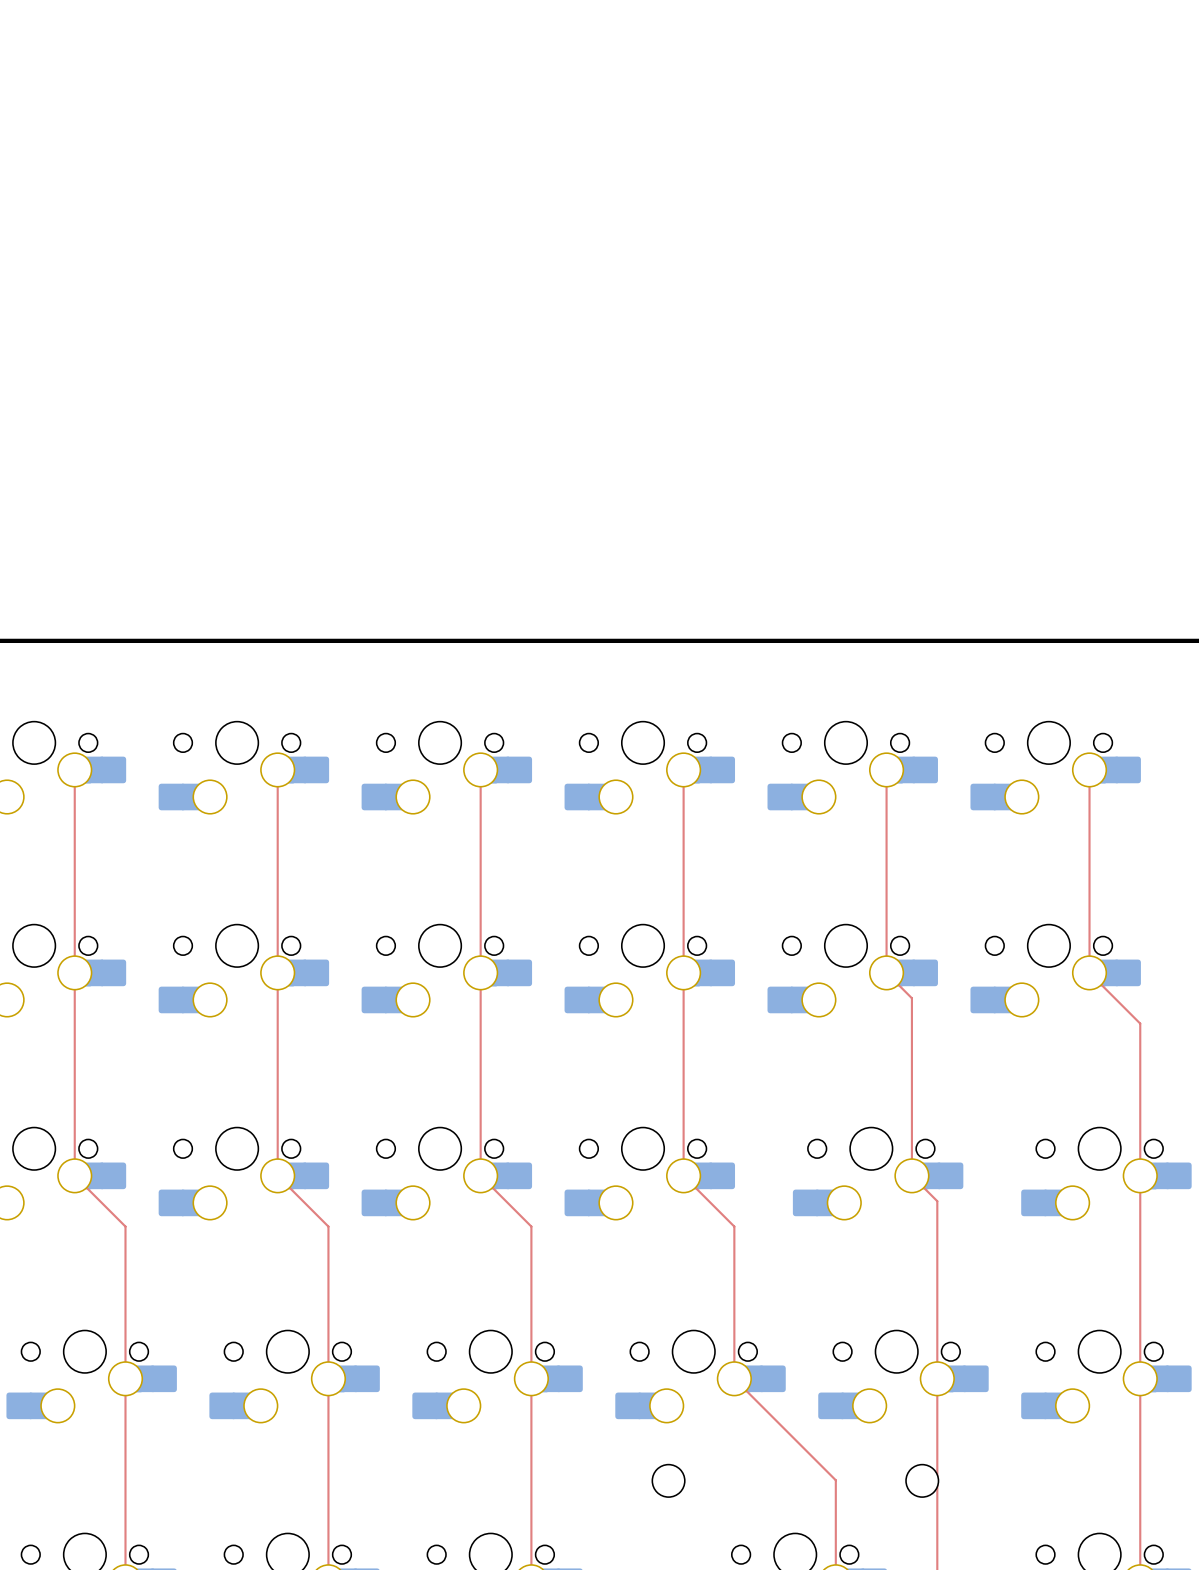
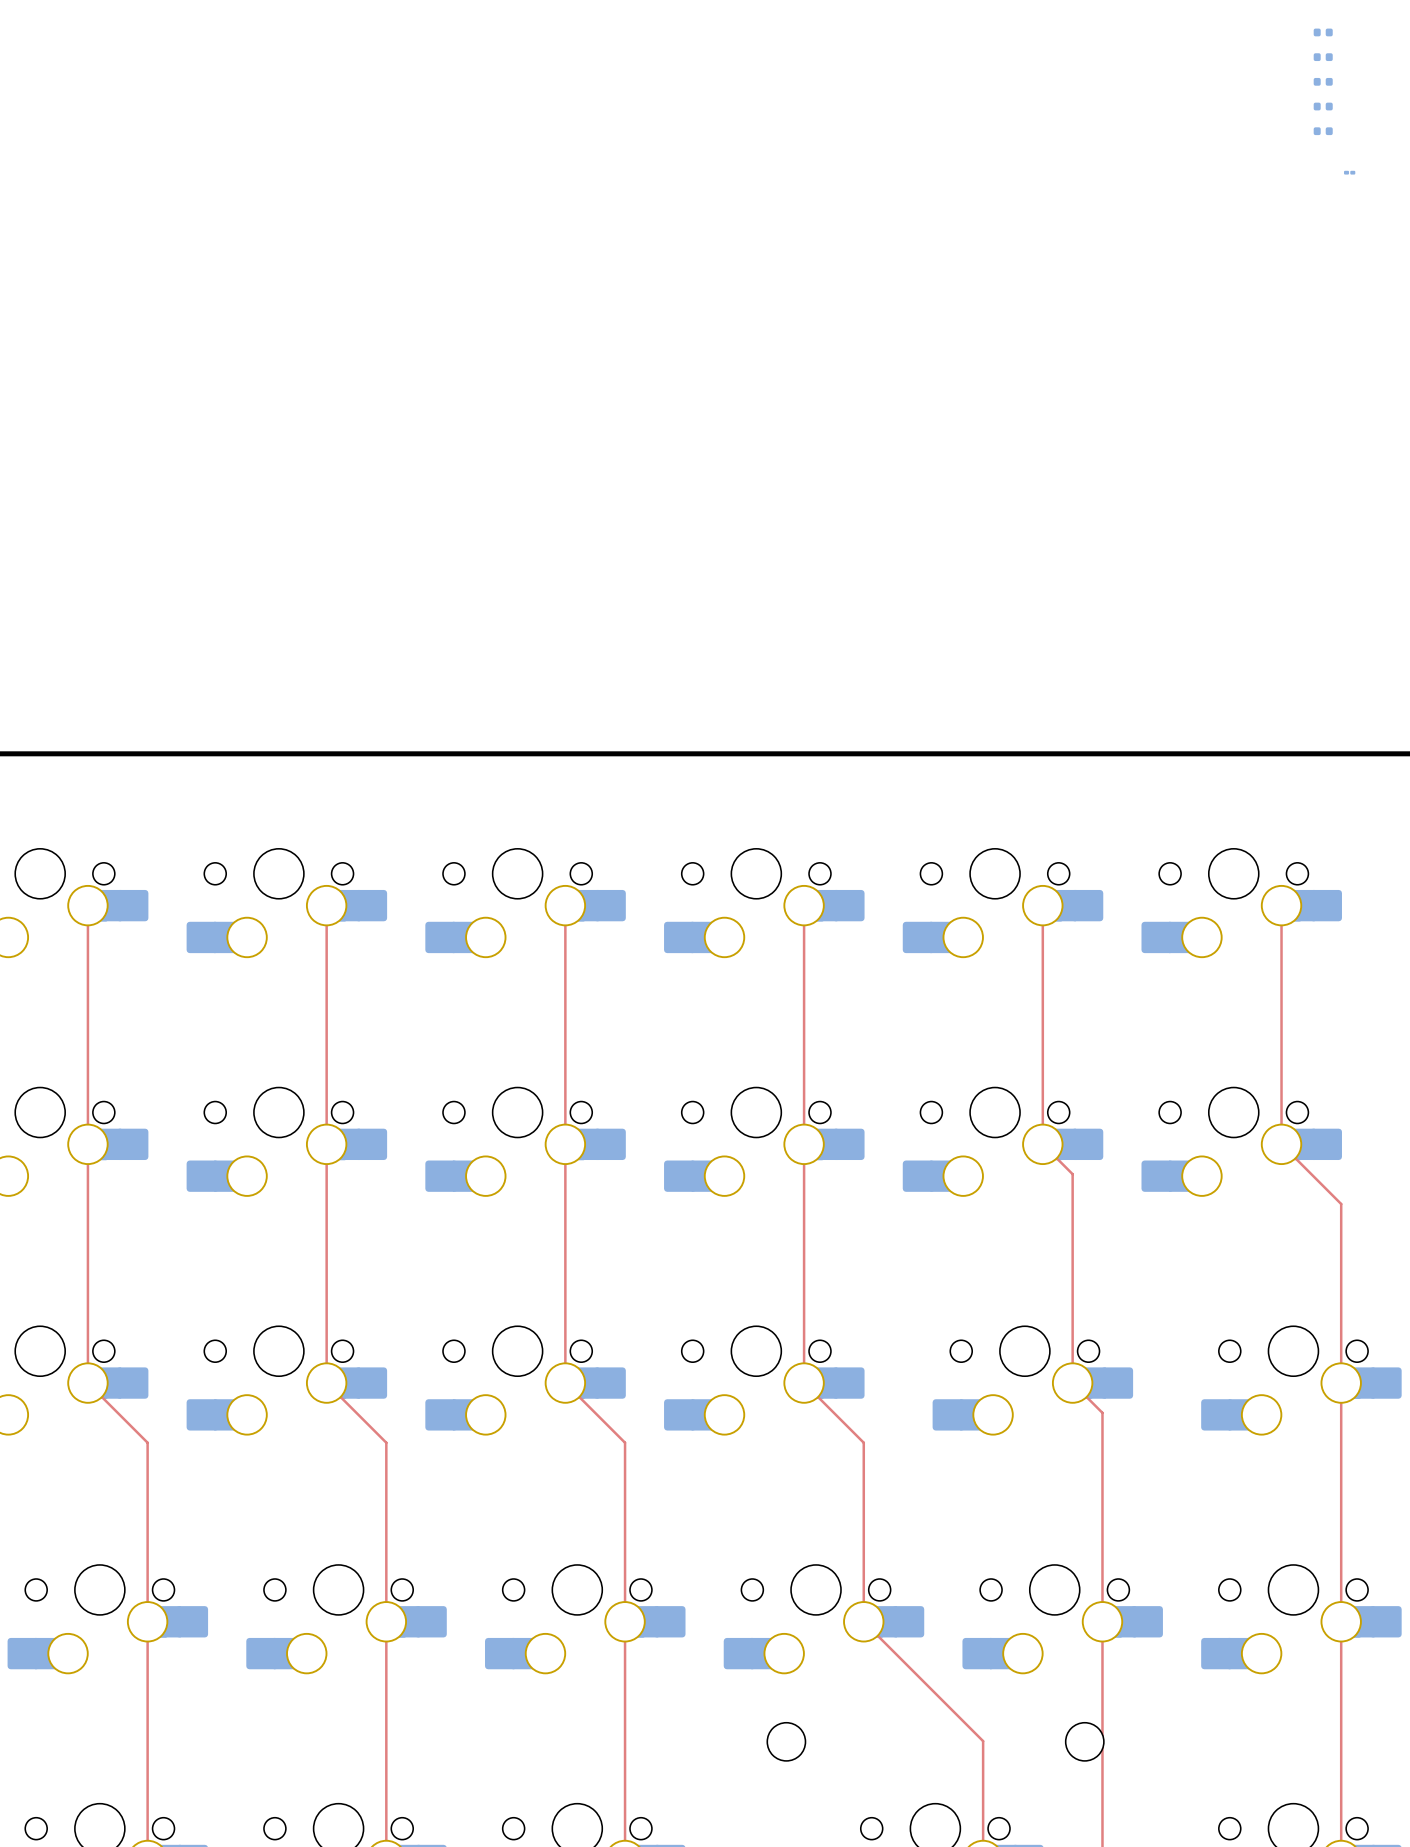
part: none -> (1323, 32)
part: none -> (1323, 57)
part: none -> (1323, 81)
part: none -> (1323, 106)
part: none -> (1323, 131)
part: none -> (1349, 172)

